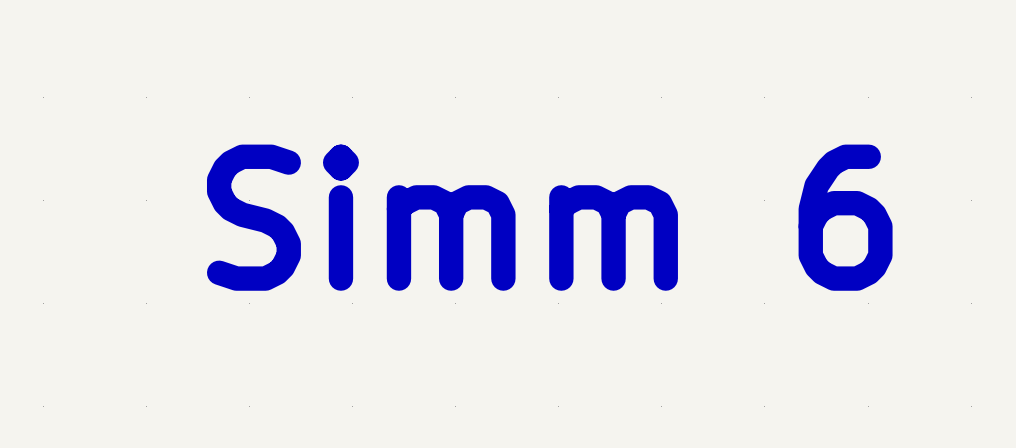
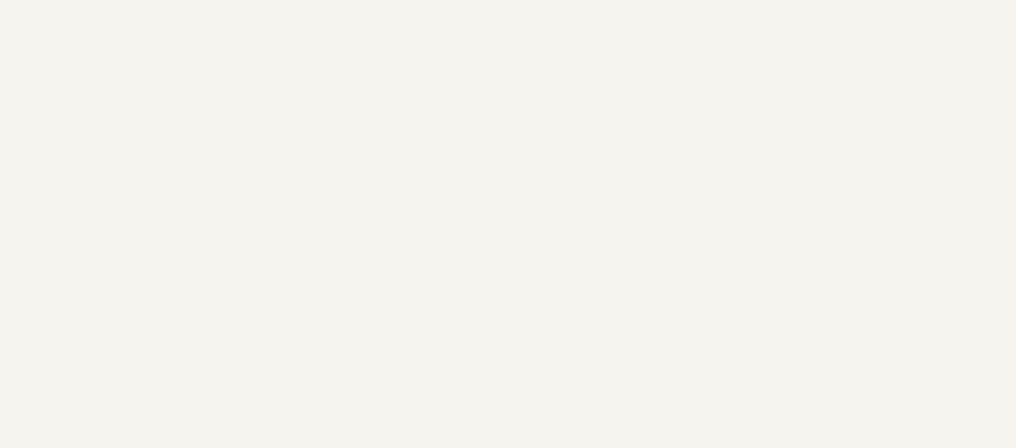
text: Simm 6 (549, 217) -> none

